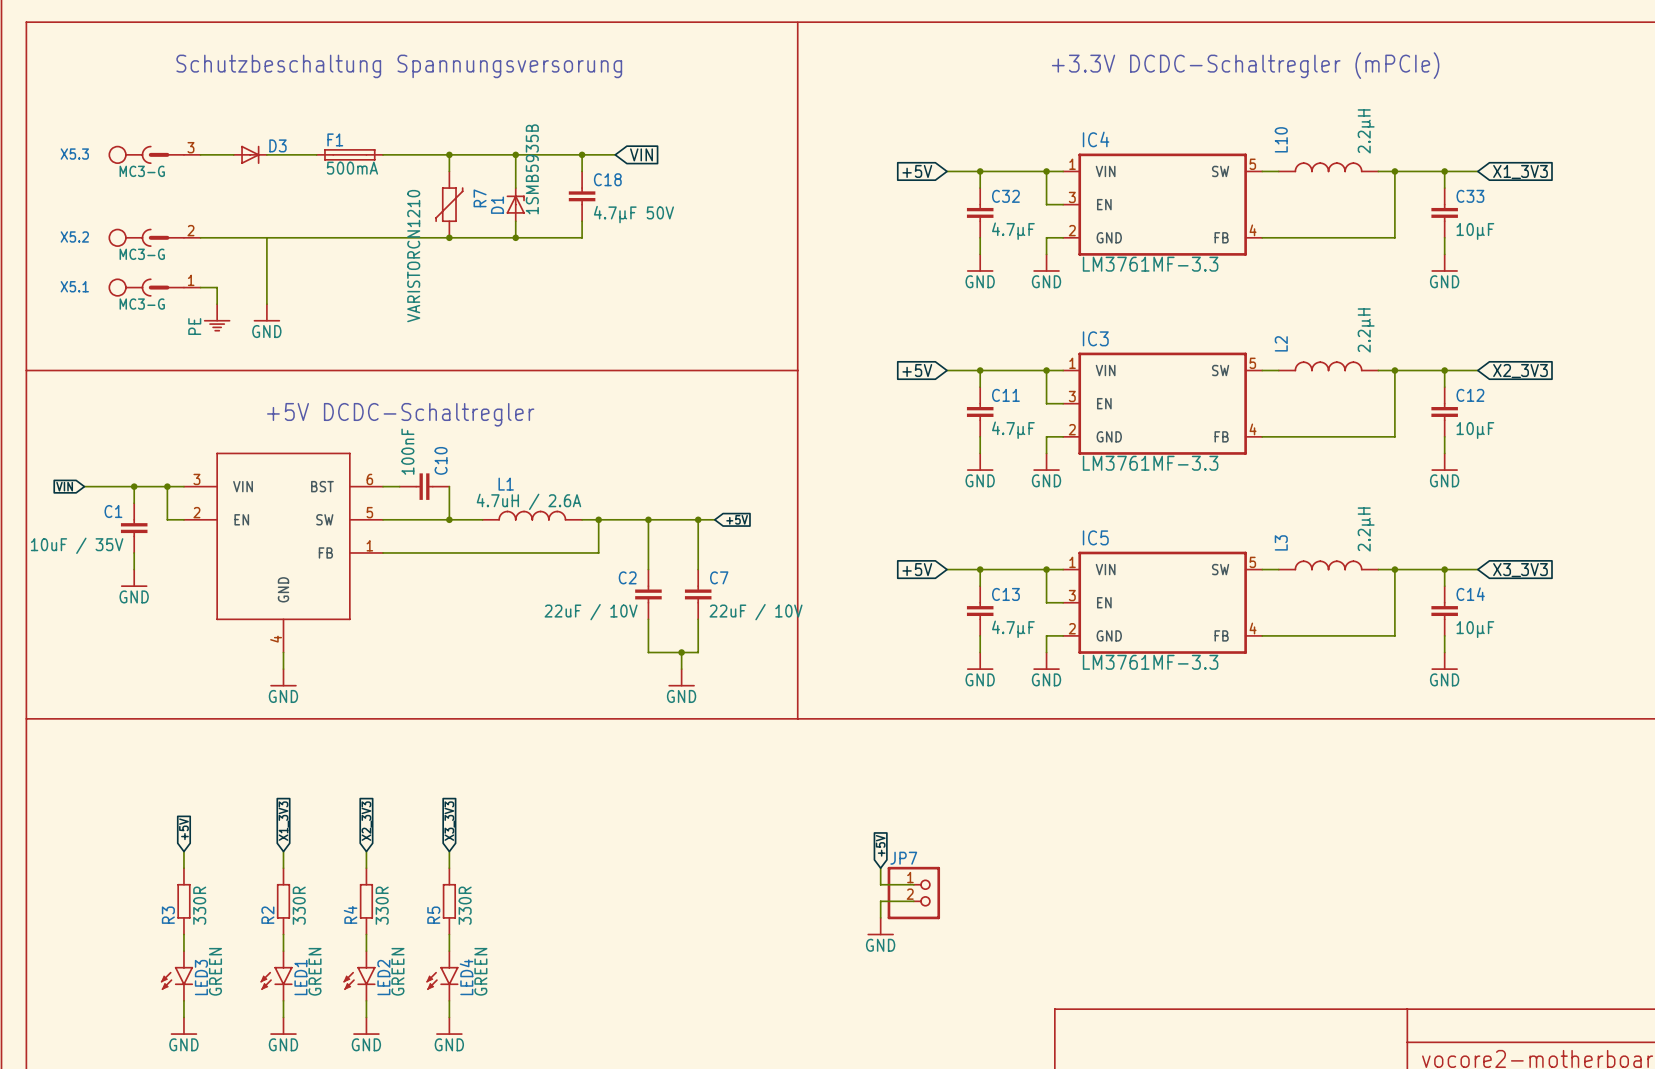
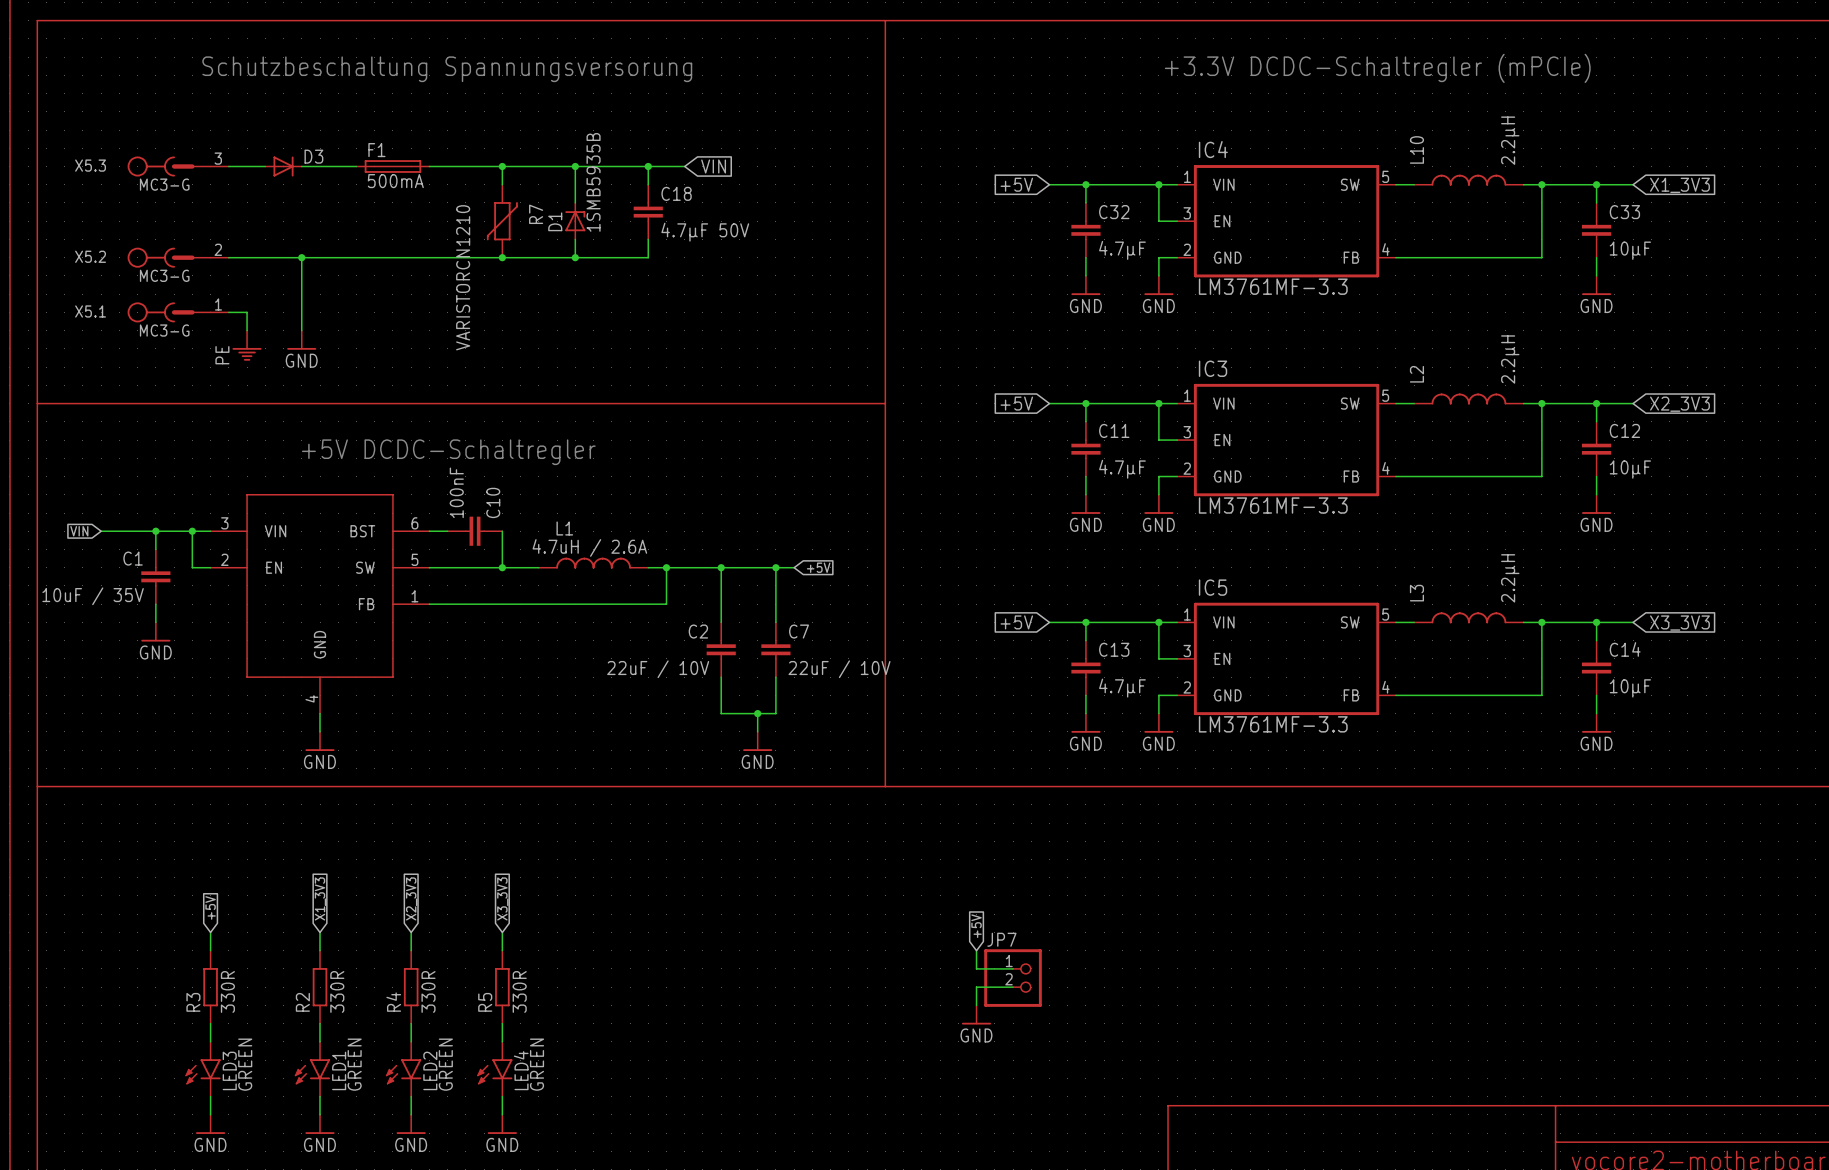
junction: none -> (301, 257)

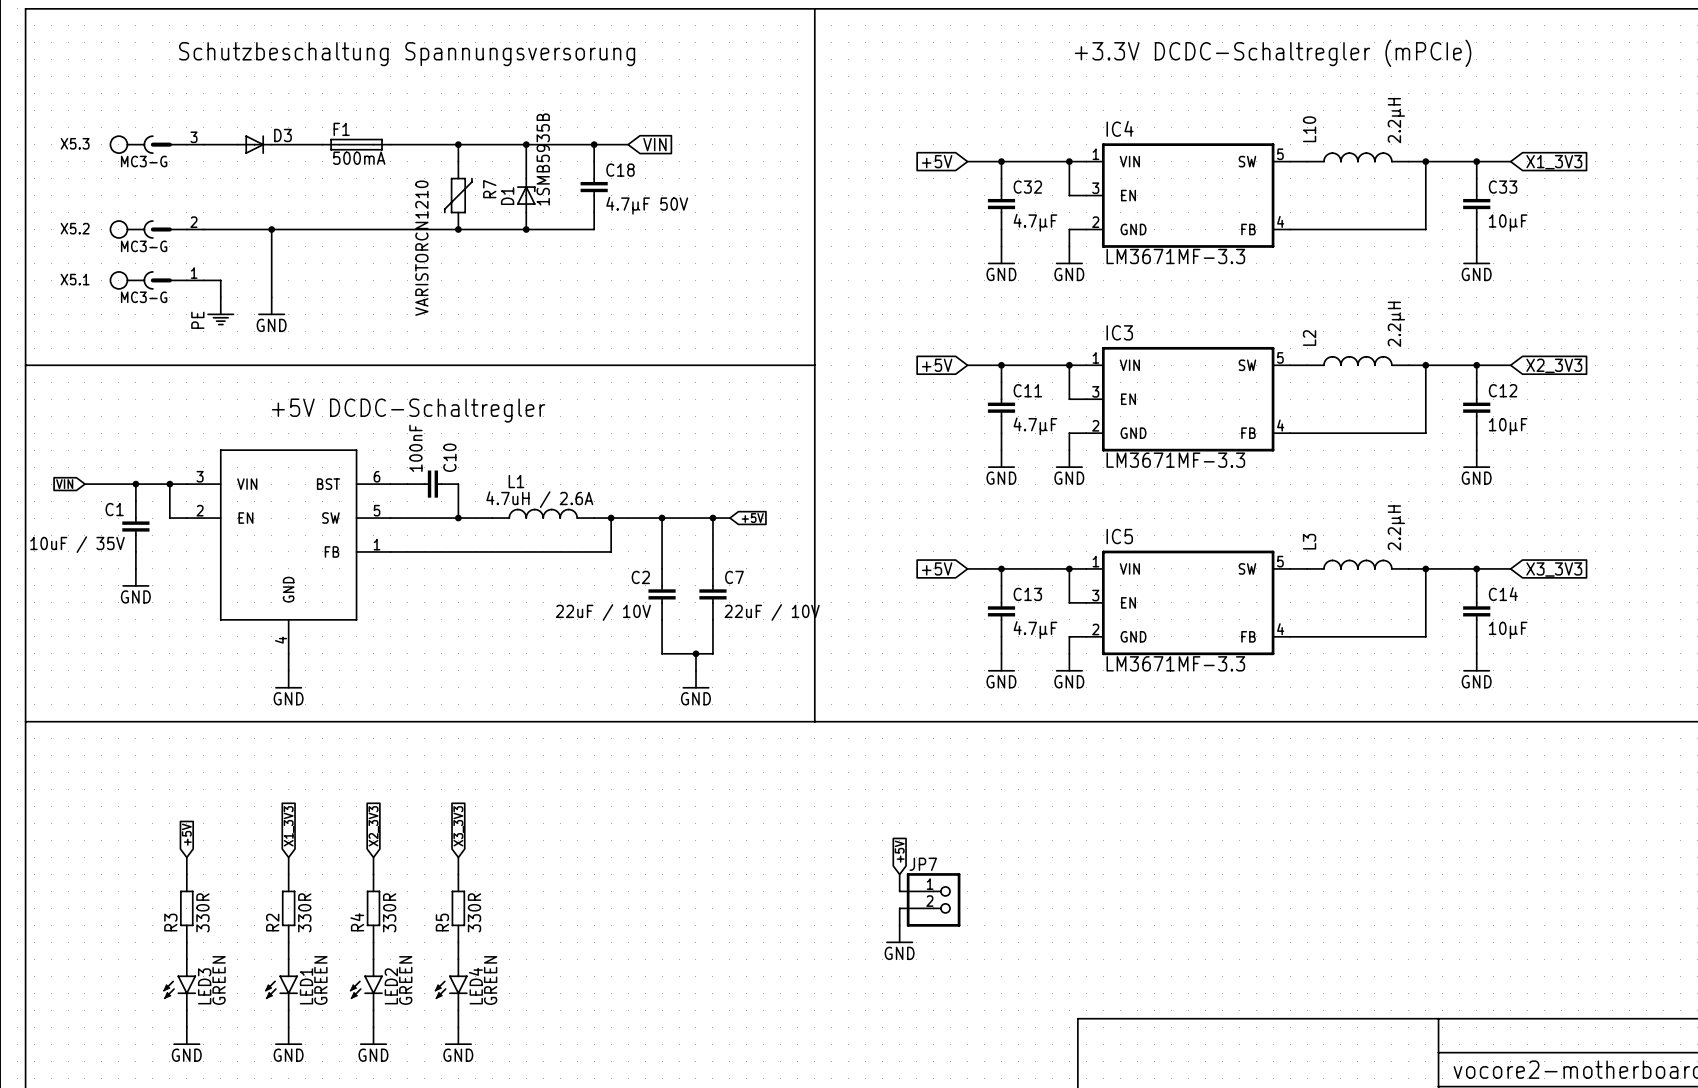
IC4 value: LM3761MF-3.3 (1273, 286) -> LM3671MF-3.3 (1175, 256)
IC3 value: LM3761MF-3.3 (1273, 505) -> LM3671MF-3.3 (1175, 460)
IC5 value: LM3761MF-3.3 (1273, 724) -> LM3671MF-3.3 (1175, 663)

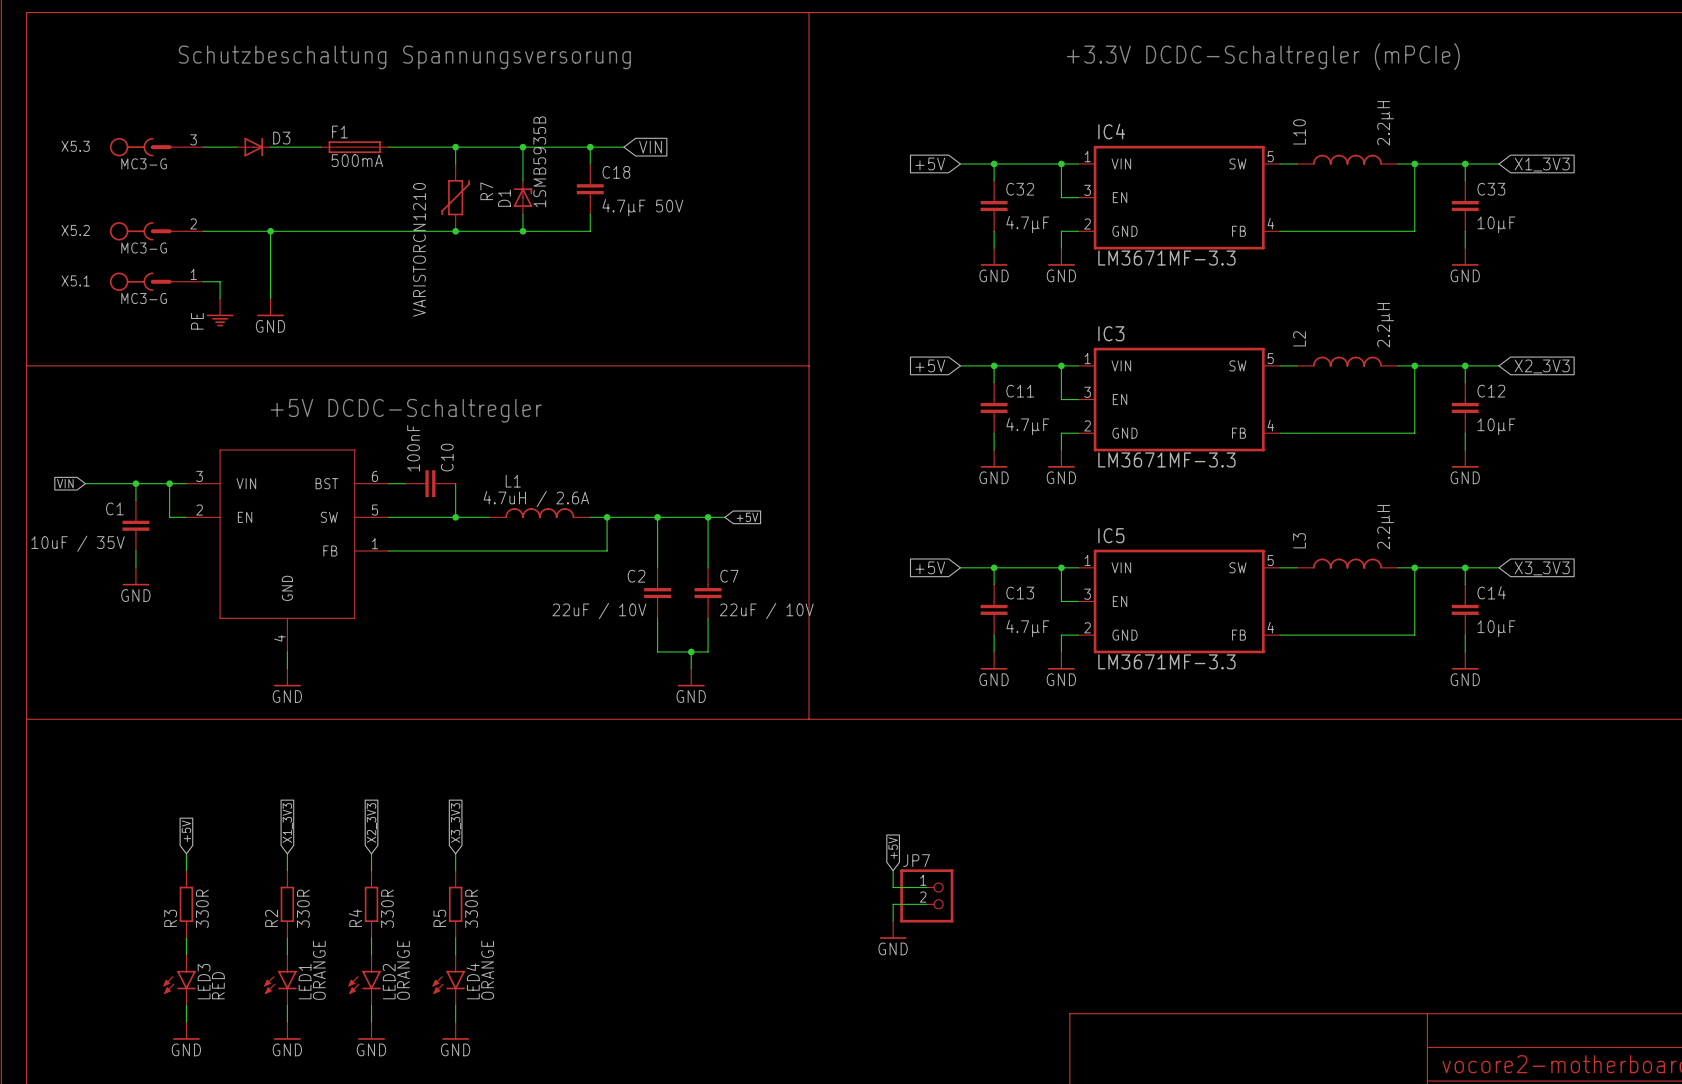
LED3 value: GREEN (219, 980) -> RED (218, 985)
LED1 value: GREEN (320, 980) -> ORANGE (319, 970)
LED2 value: GREEN (405, 980) -> ORANGE (403, 970)
LED4 value: GREEN (490, 980) -> ORANGE (487, 970)

